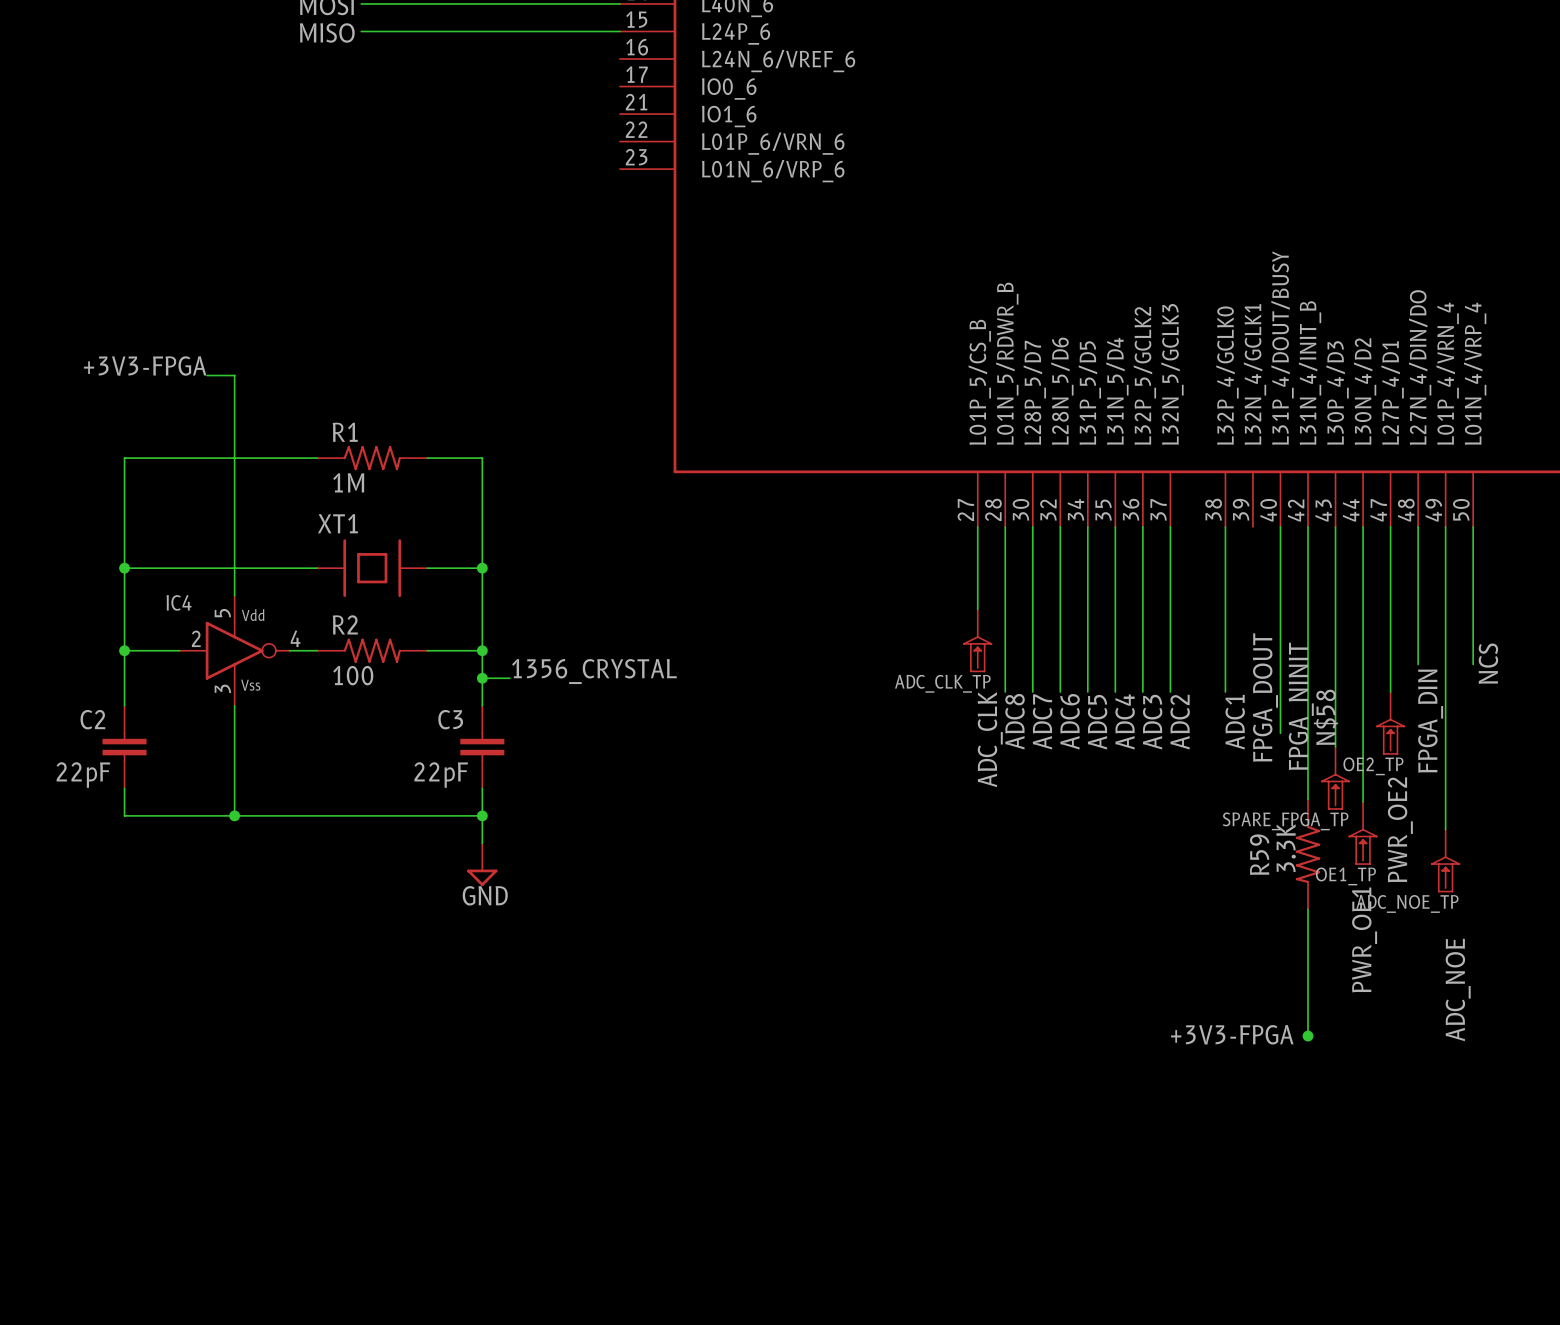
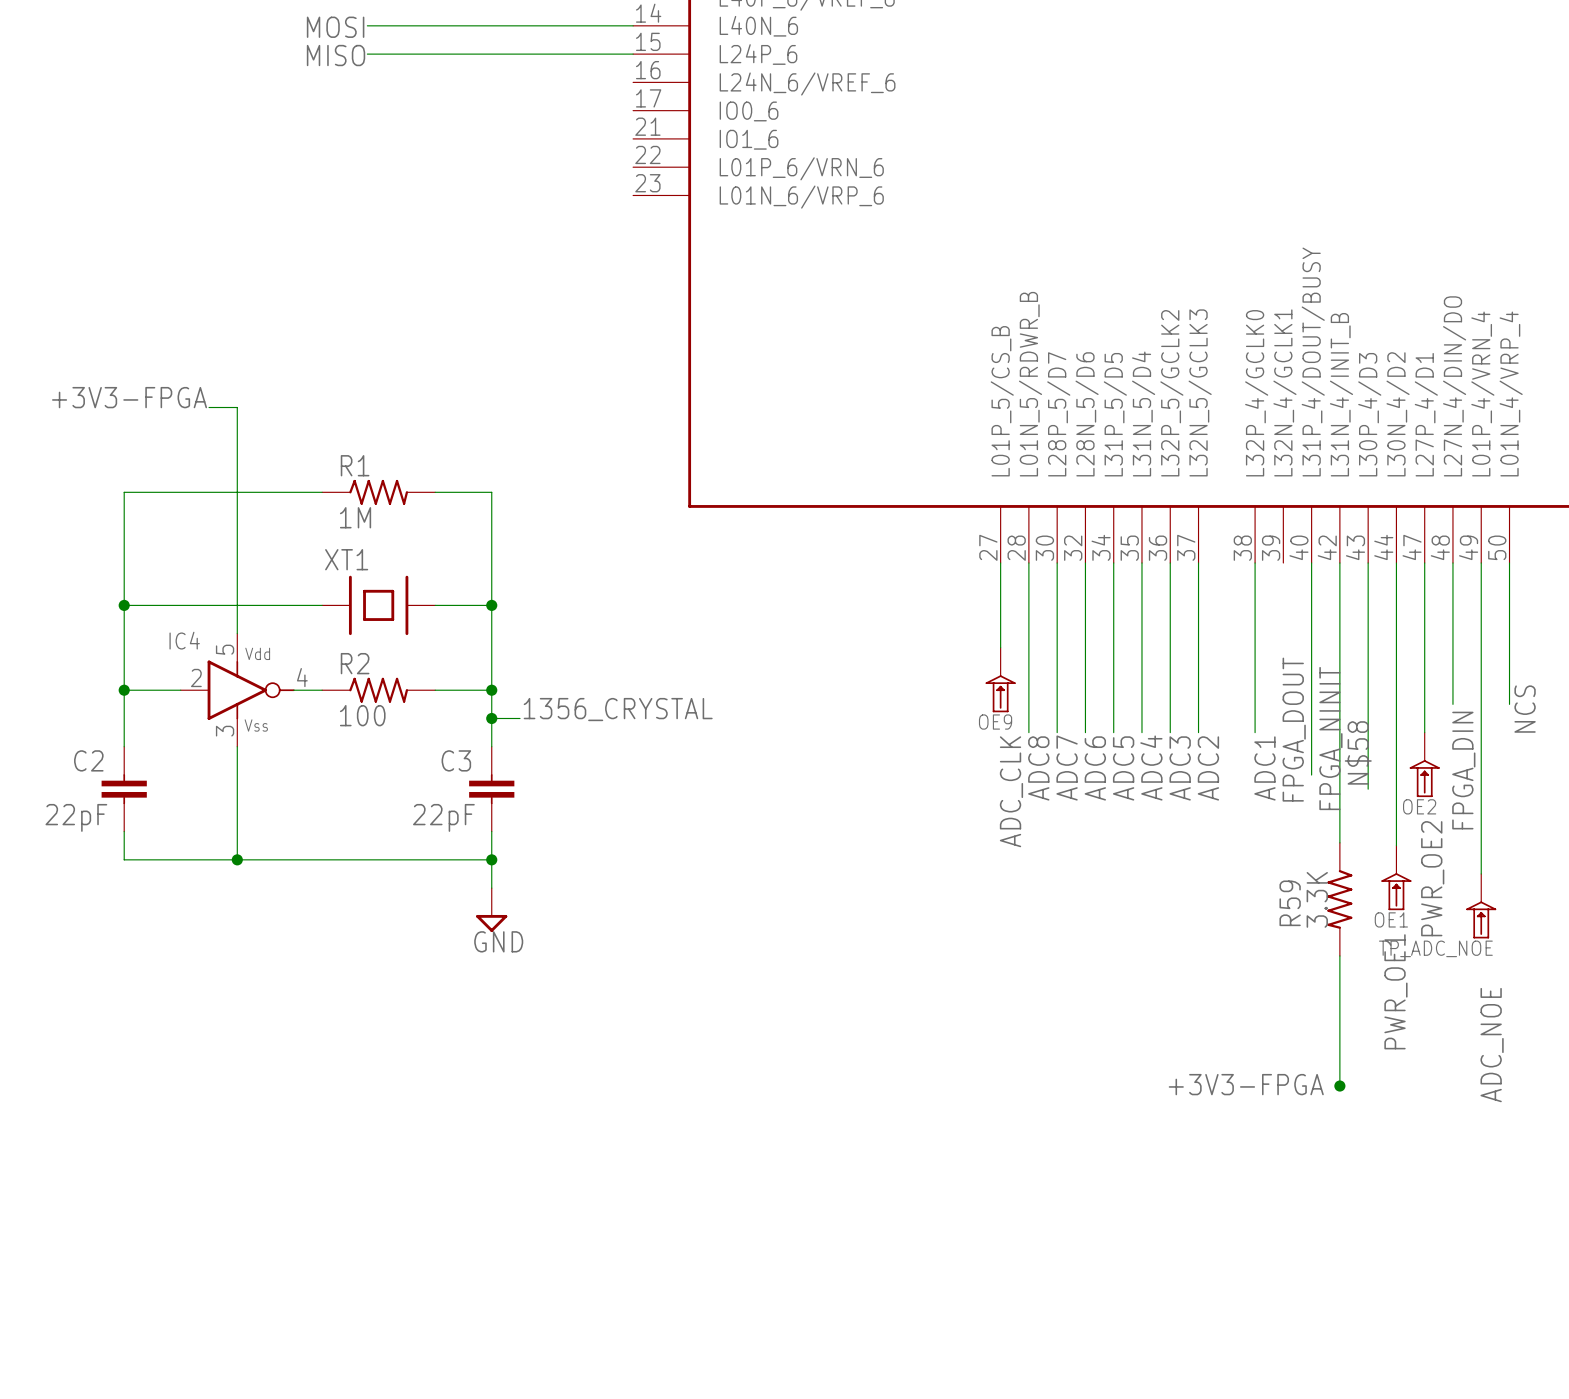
ADC_CLK_TP name: ADC_CLK_TP (942, 683) -> OE9 (995, 722)
OE2_TP name: OE2_TP (1373, 766) -> OE2 (1419, 806)
SPARE_FPGA_TP: (1335, 778) -> none
OE1_TP name: OE1_TP (1345, 876) -> OE1 (1391, 919)
ADC_NOE_TP name: ADC_NOE_TP (1407, 903) -> TP_ADC_NOE (1435, 948)

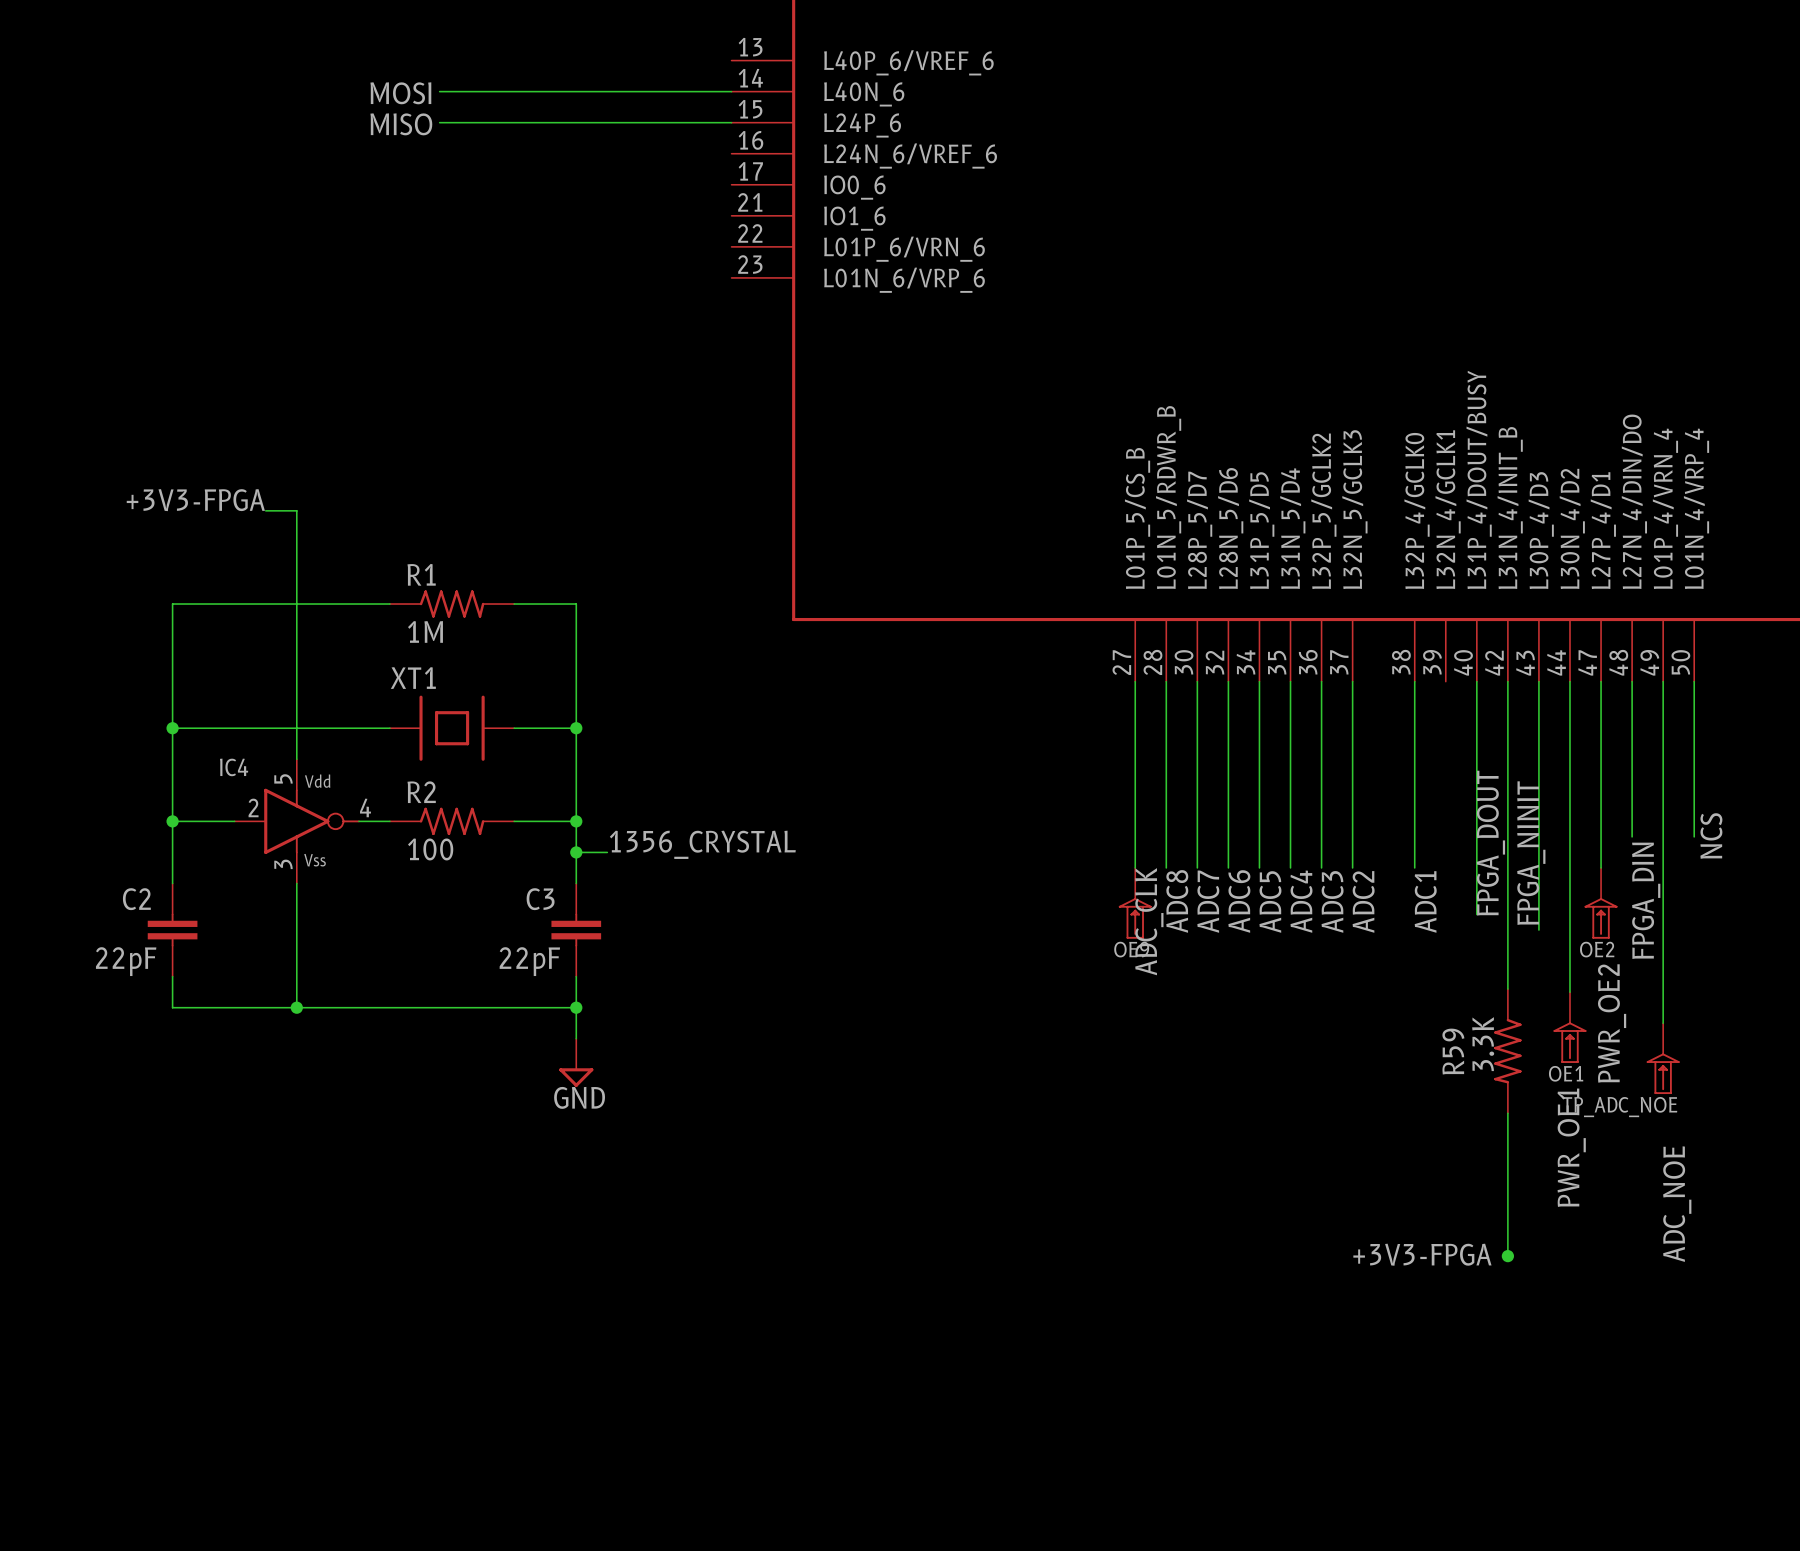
OE9 position: (1000, 680) -> (1135, 903)
label position: FPGA_DOUT (1294, 729) -> FPGA_DOUT (1490, 843)
label: FPGA_NINIT (1330, 738) -> none
label: N$58 (1358, 752) -> FPGA_NINIT (1531, 853)

